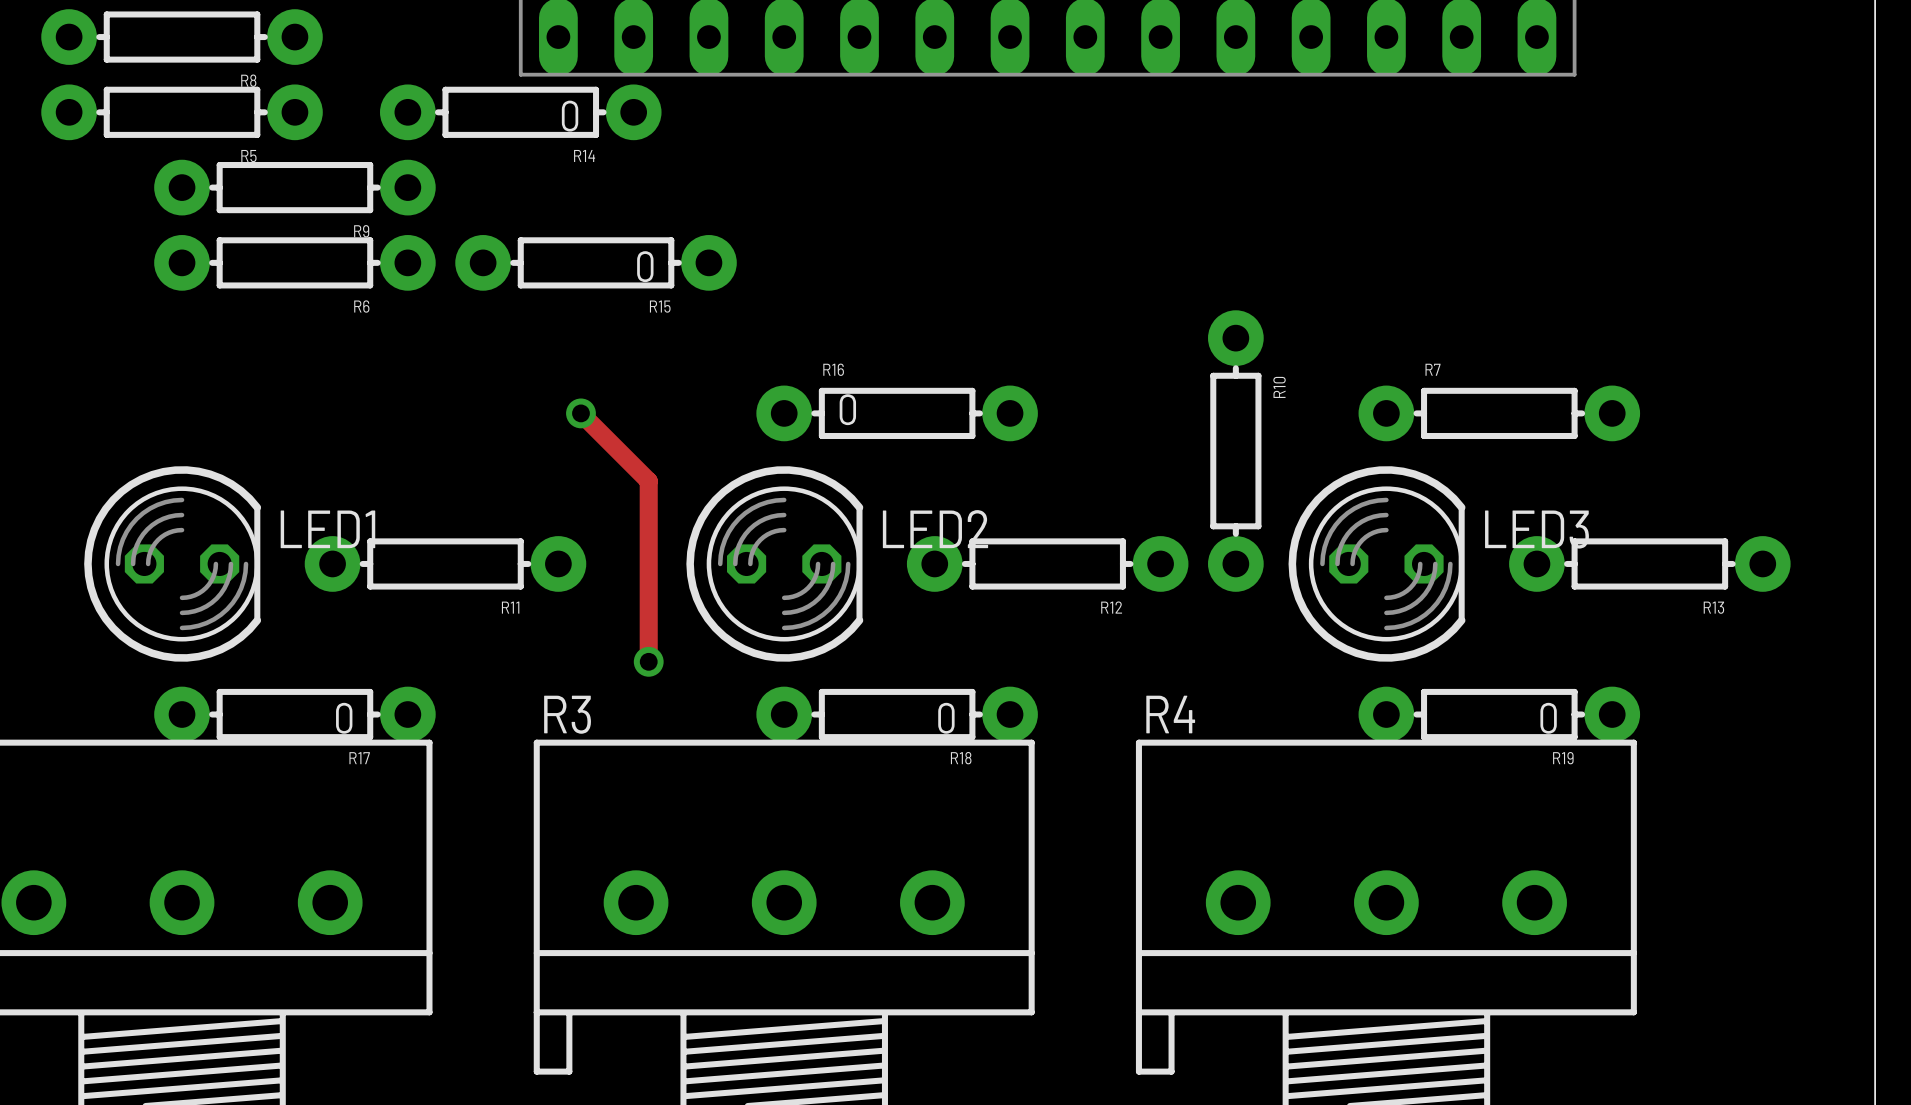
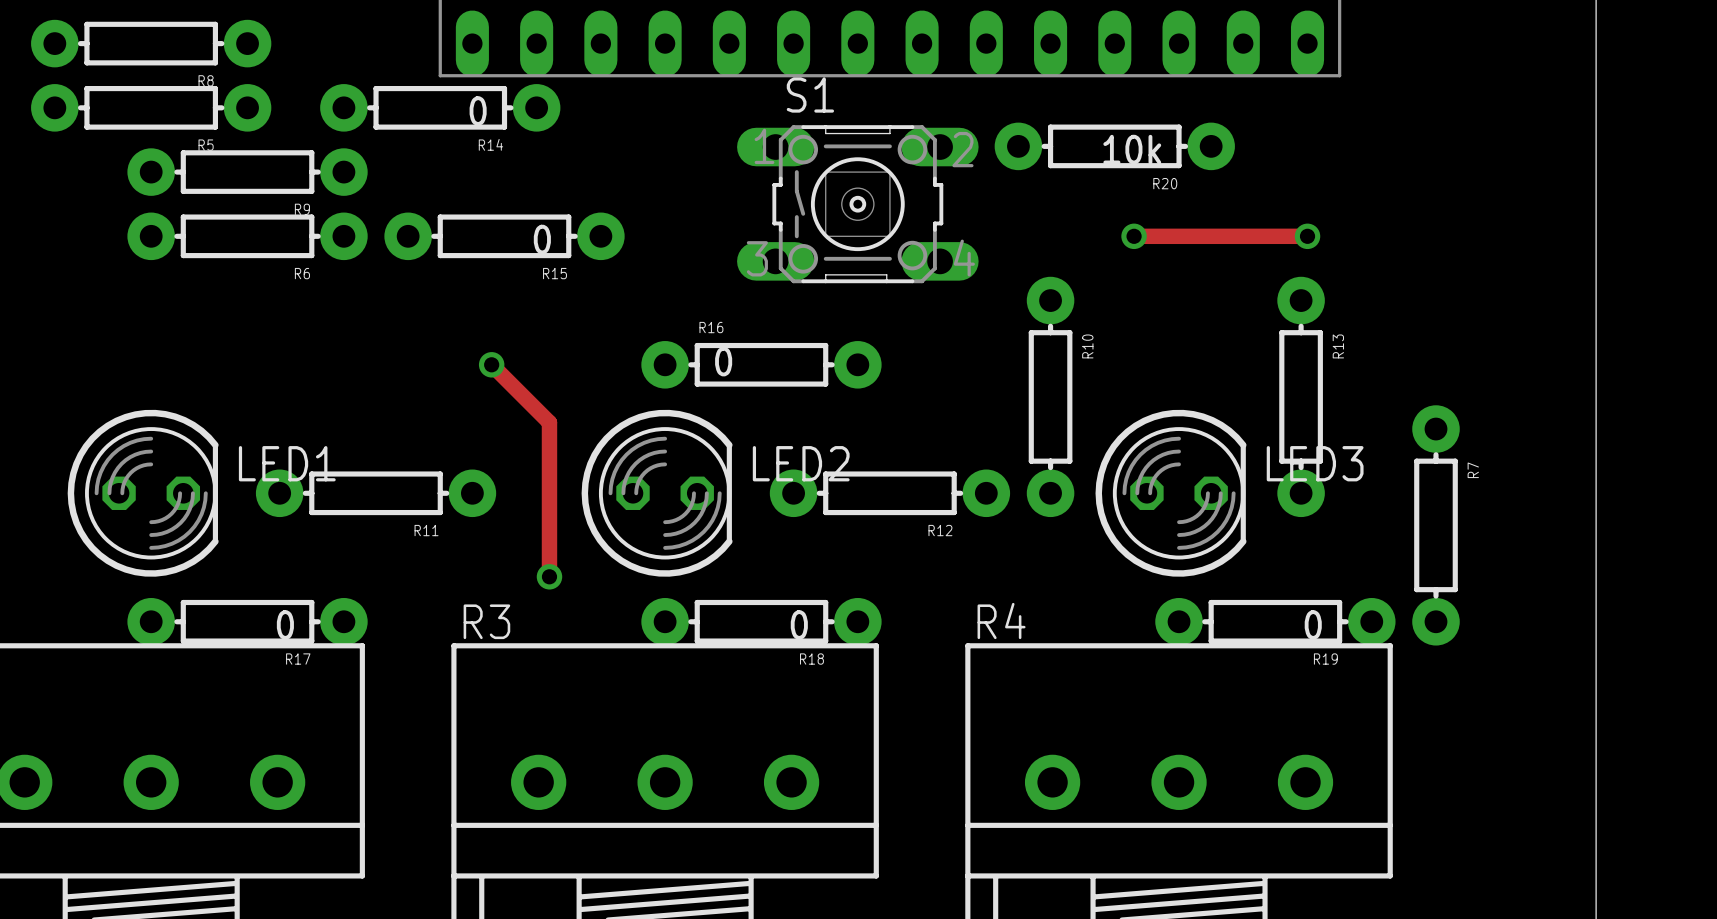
R20: none -> 10k (1114, 146)
S1: none -> (857, 204)
track: none -> (1134, 236) (1307, 236)
via: none -> (1134, 236)
via: none -> (1307, 236)
R7 rotation: 0° (1499, 413) -> 90° clockwise (1436, 525)
R7 position: (1499, 413) -> (1436, 525)
R13 rotation: 0° (1649, 563) -> 90° clockwise (1301, 396)
R13 name position: R13 (1713, 607) -> R13 (1338, 346)

